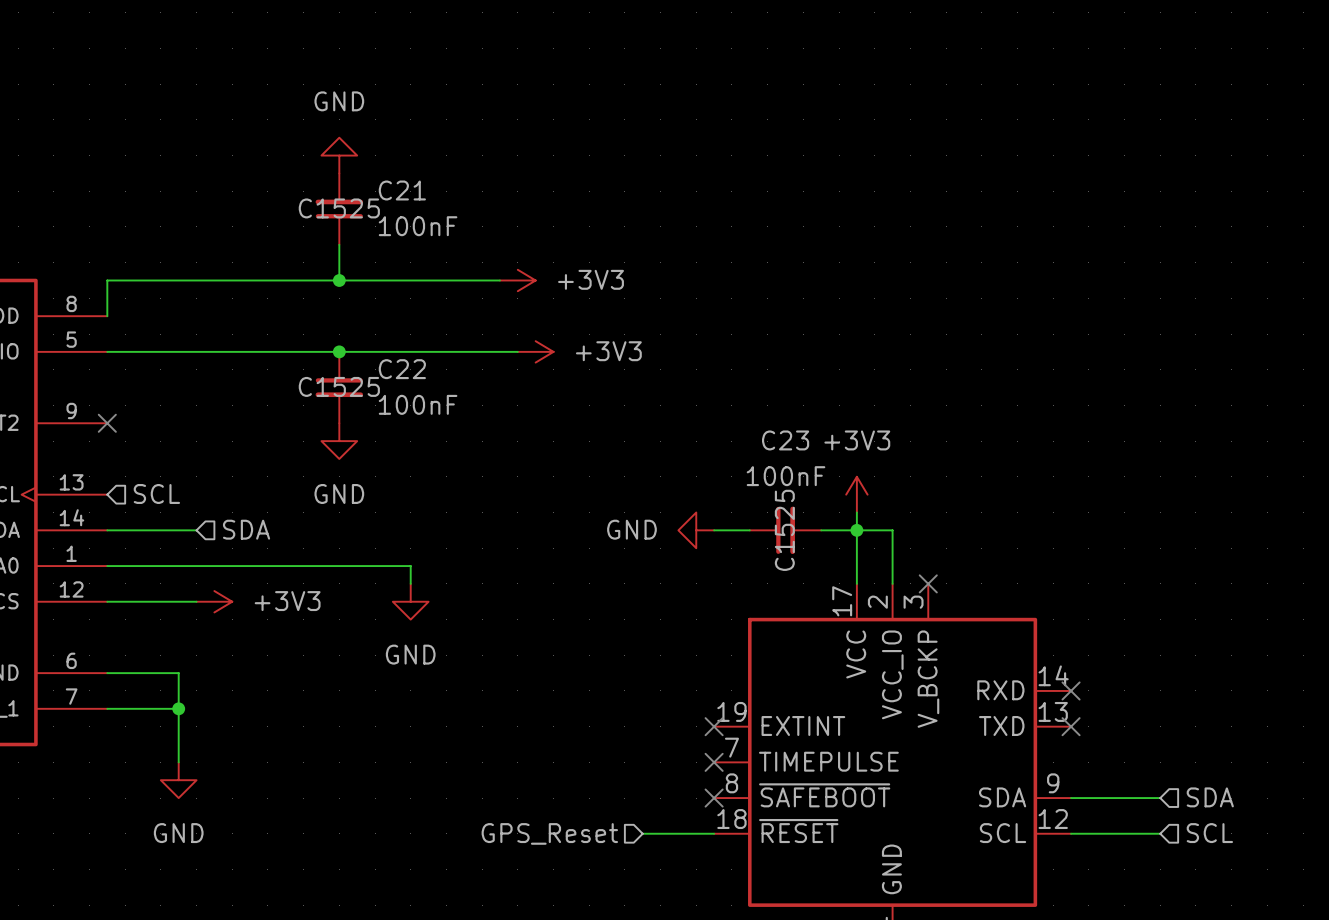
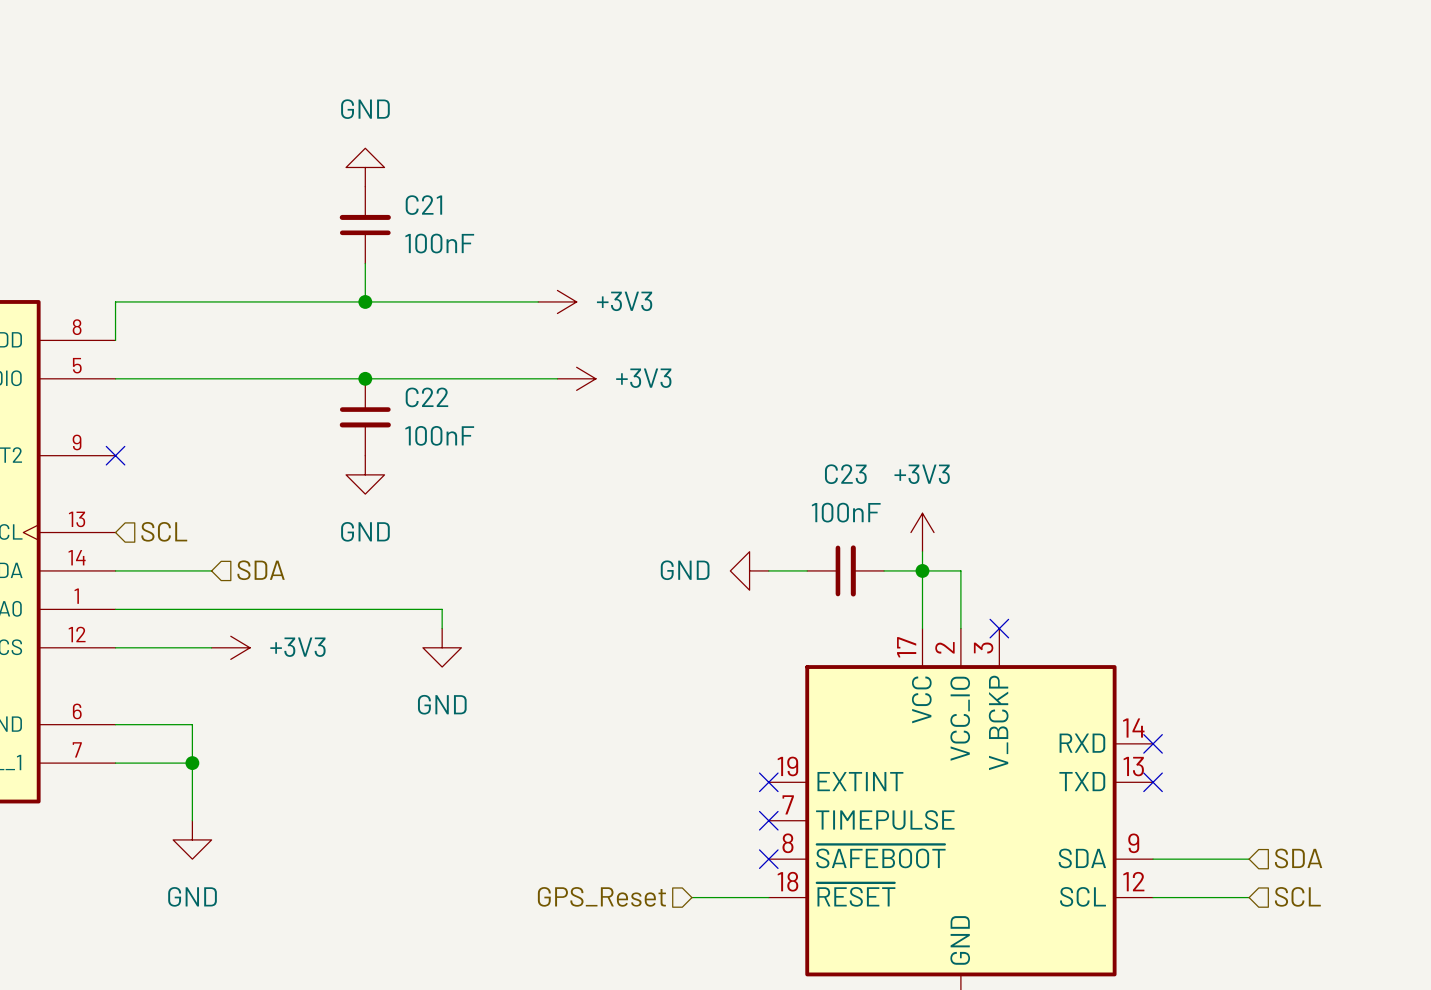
C21 text: C1525 (339, 208) -> none
C22 text: C1525 (339, 386) -> none
C23 text: C1525 (784, 530) -> none

